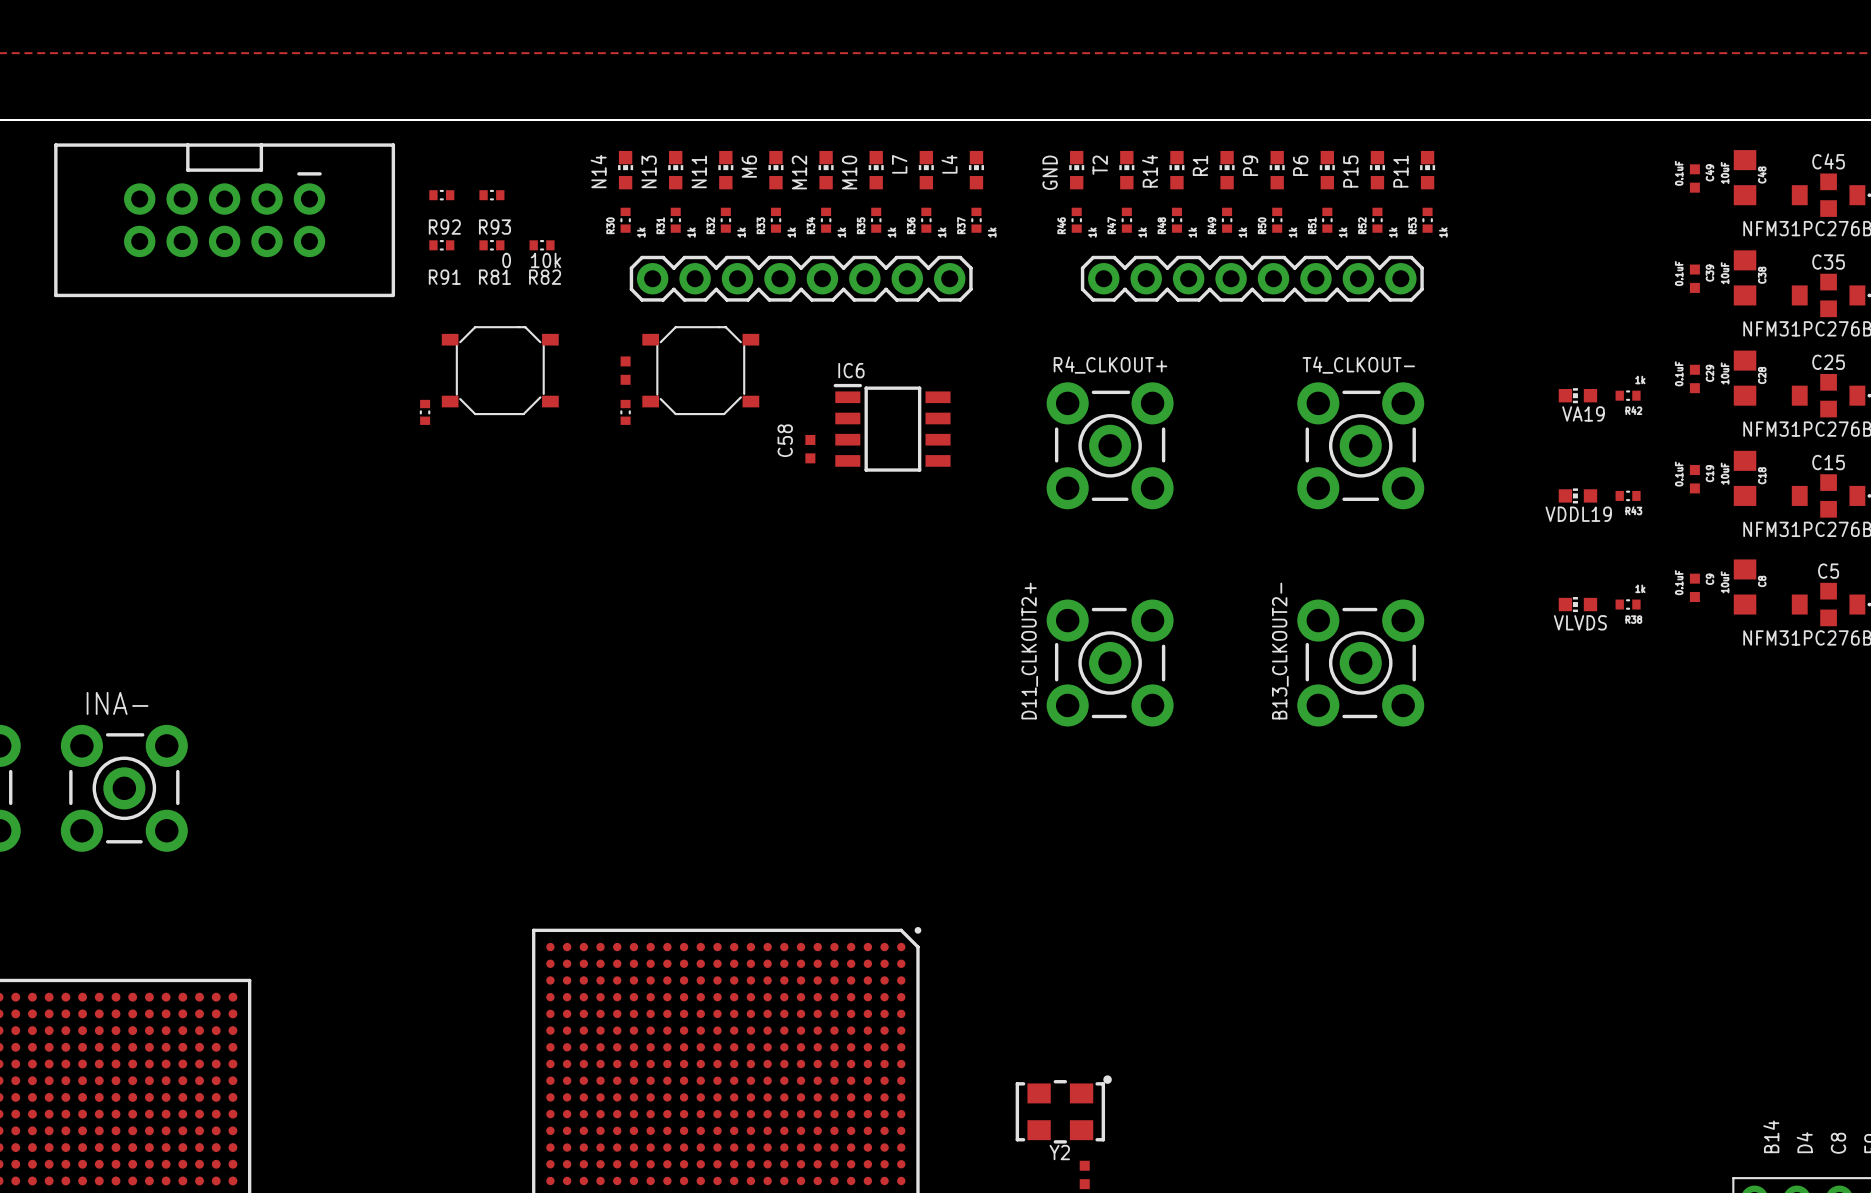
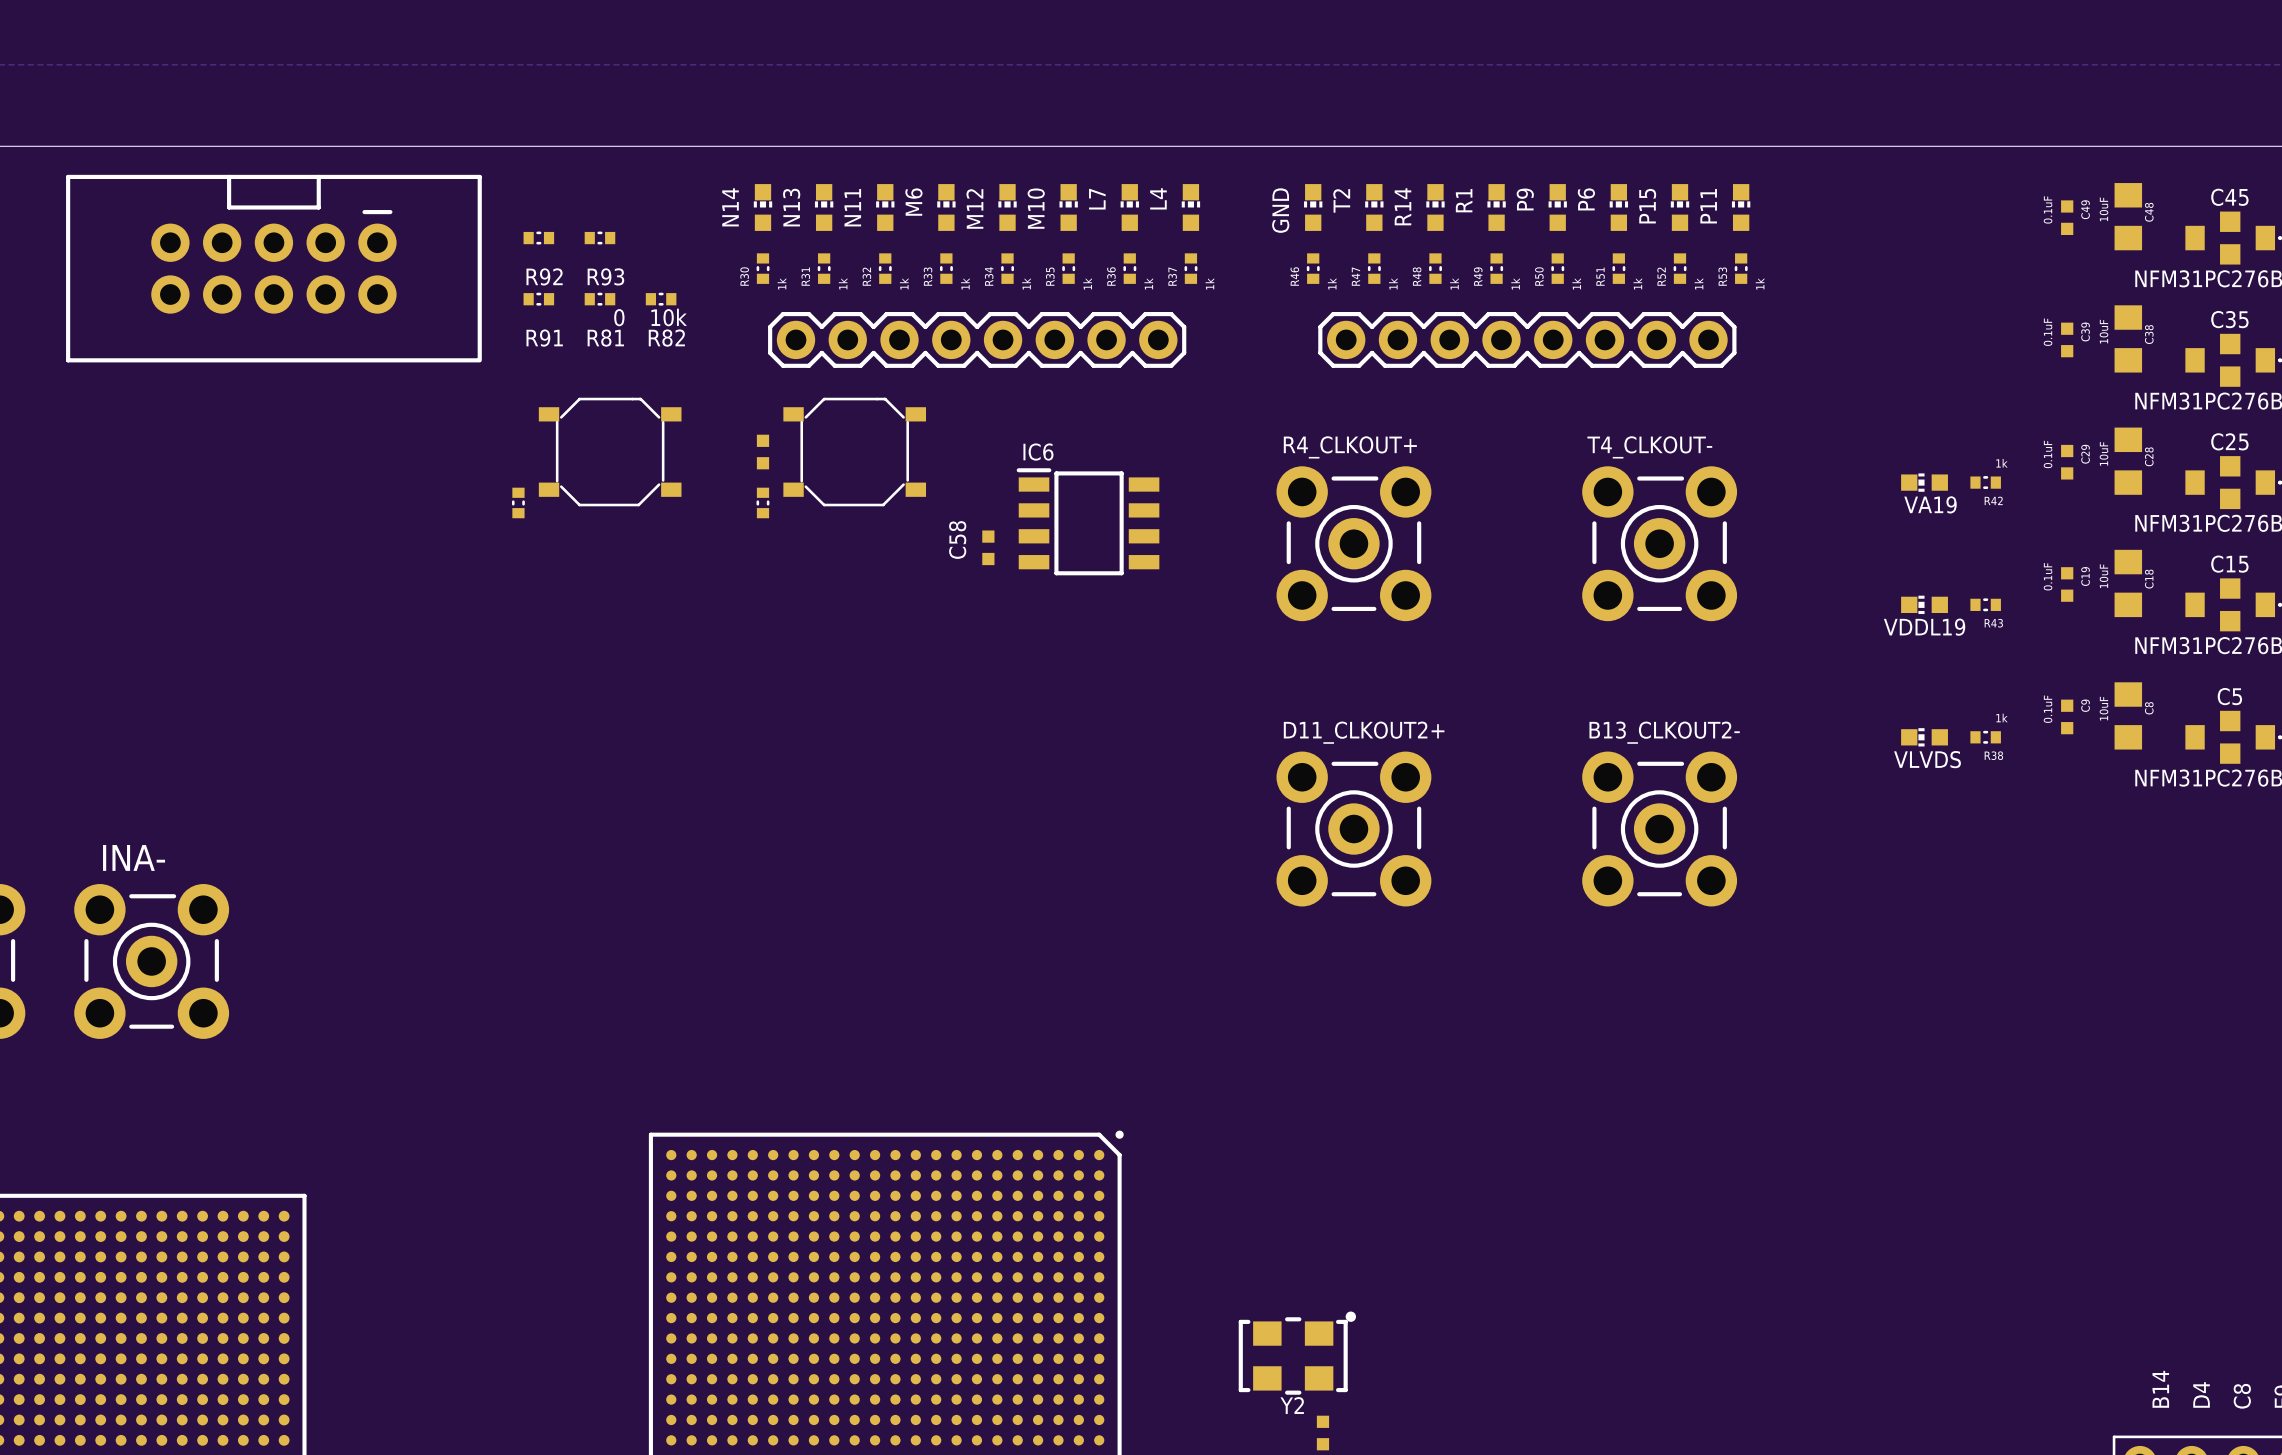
D11_CLKOUT2+ rotation: 0° (1110, 663) -> 90° clockwise (1353, 829)
B13_CLKOUT2- rotation: 0° (1360, 663) -> 90° clockwise (1659, 829)

